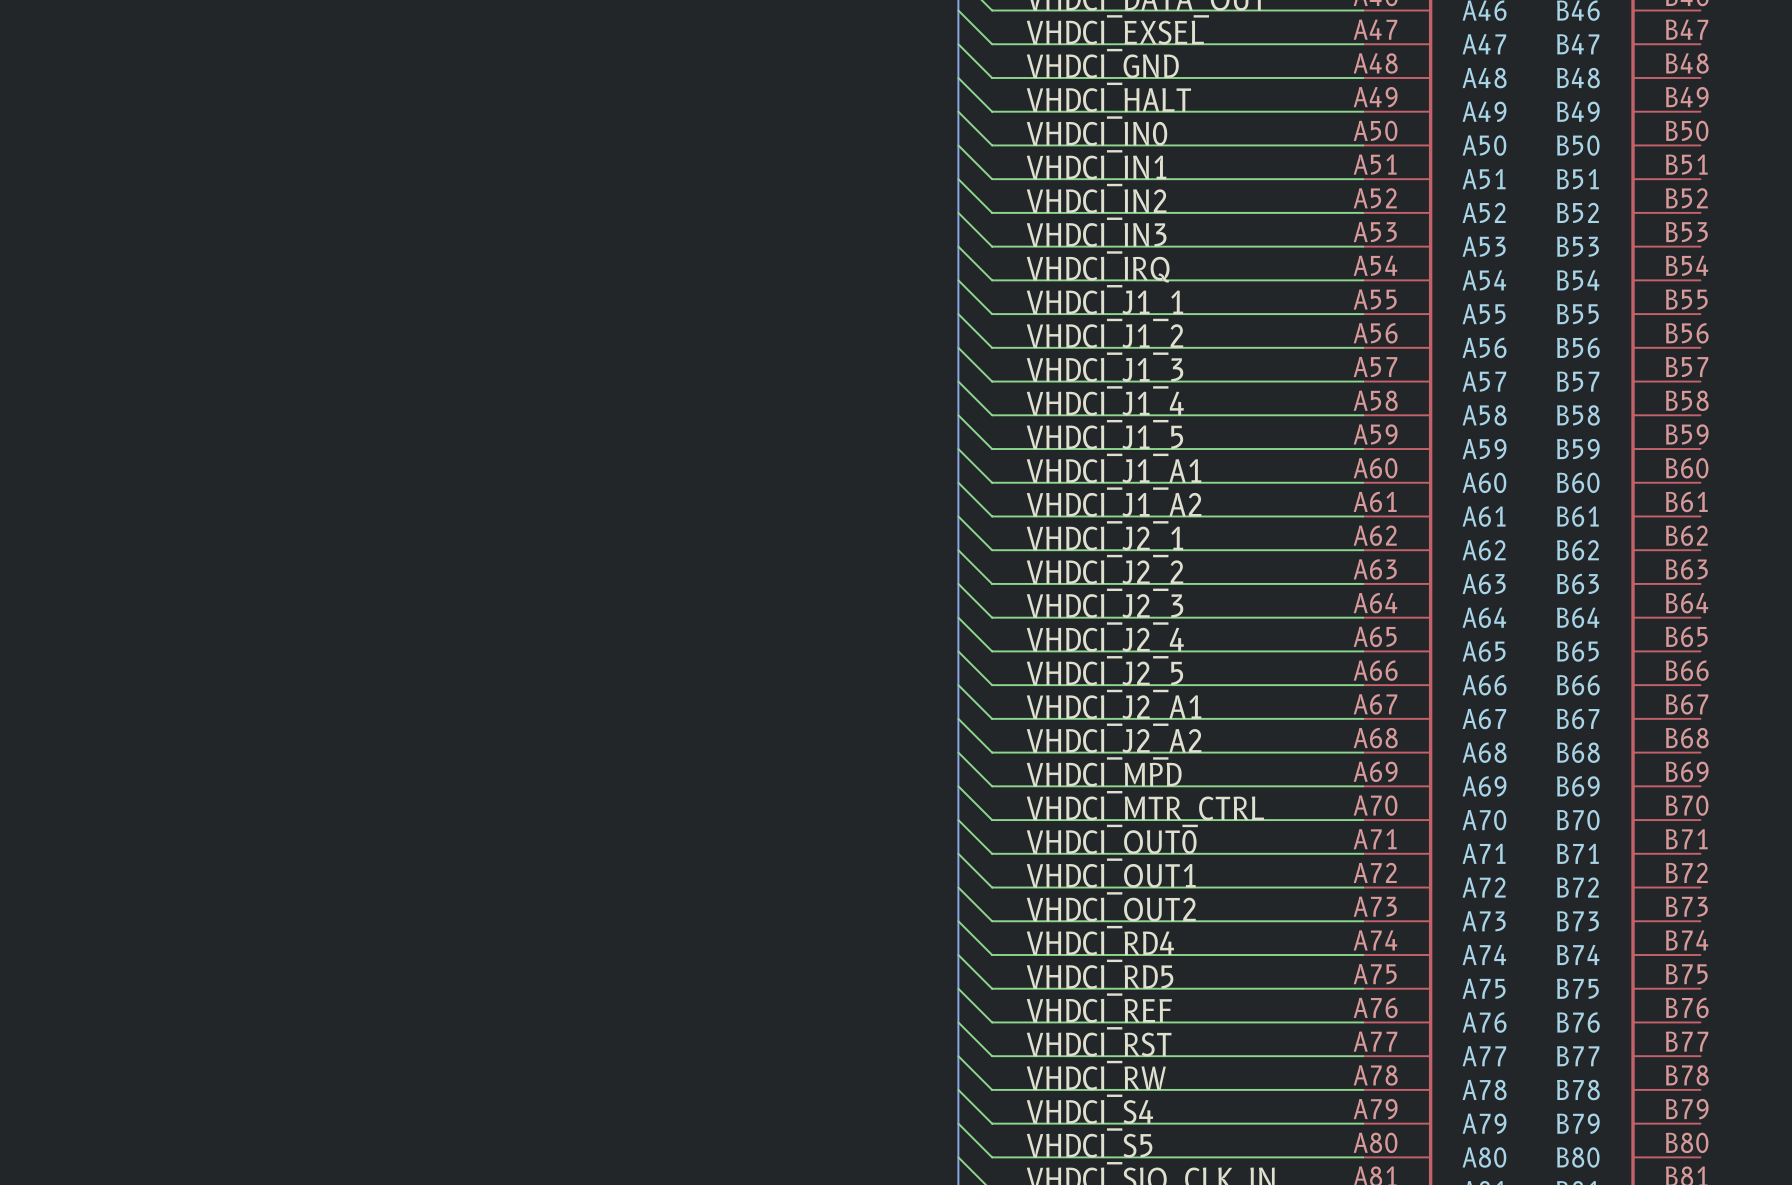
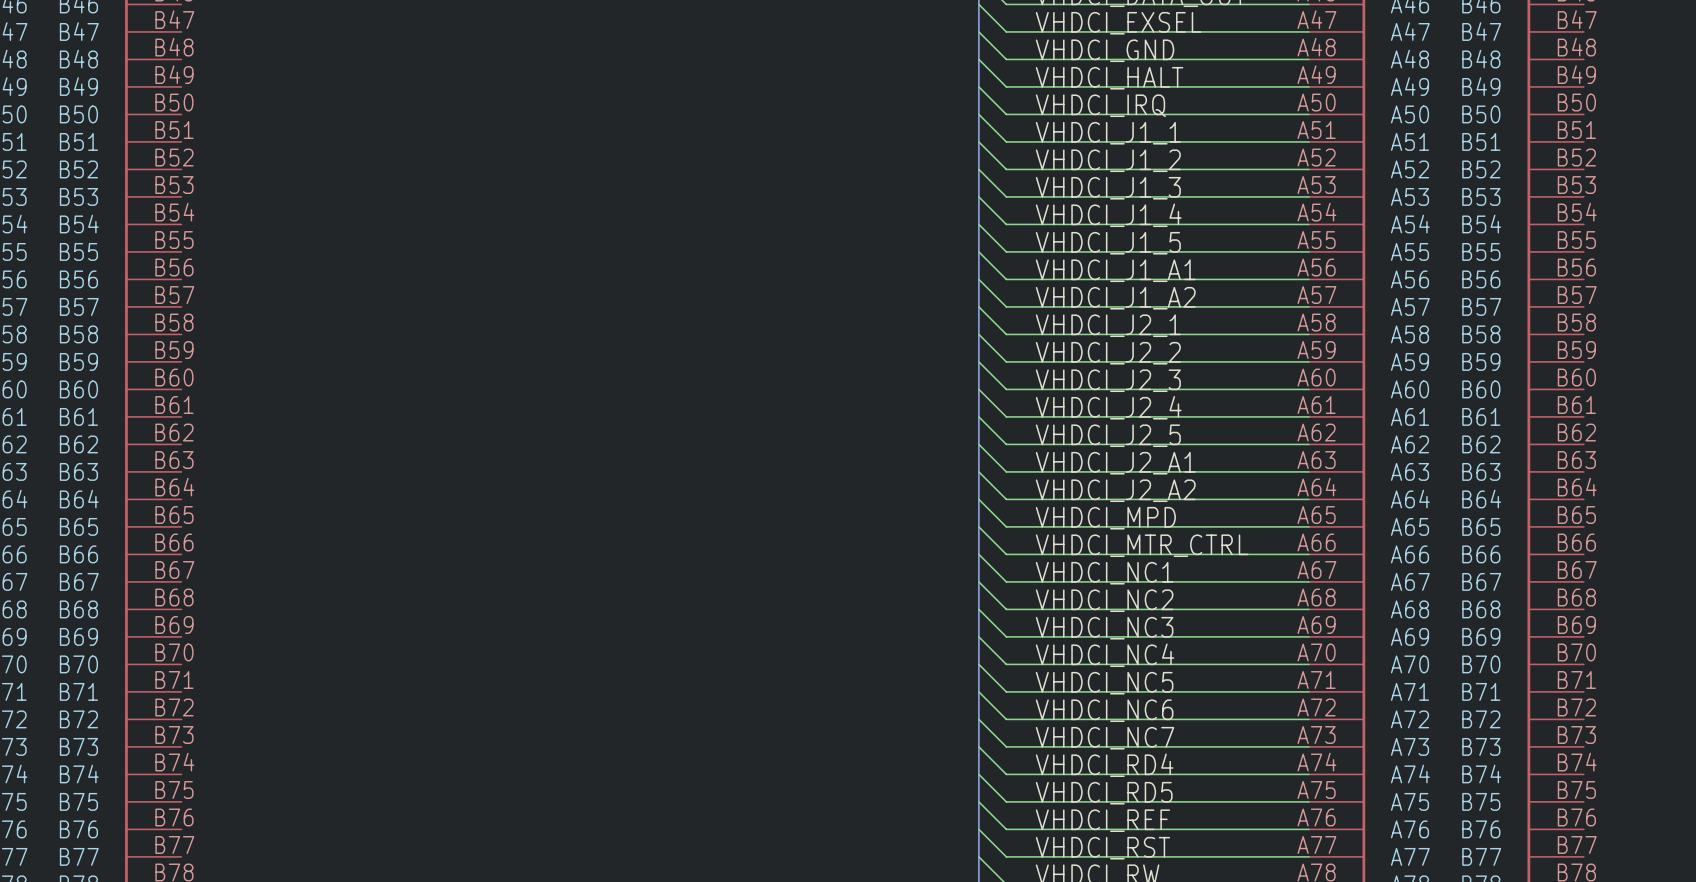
label: VHDCI_IN0 (1096, 137) -> VHDCI_IRQ (1100, 105)
label: VHDCI_IN1 (1096, 170) -> VHDCI_J1_1 (1108, 133)
label: VHDCI_IN2 (1096, 204) -> VHDCI_J1_2 (1108, 160)
label: VHDCI_IN3 (1096, 238) -> VHDCI_J1_3 (1108, 188)
label: VHDCI_IRQ (1098, 272) -> VHDCI_J1_4 (1108, 215)
label: VHDCI_J1_1 (1104, 305) -> VHDCI_J1_5 (1108, 243)
label: VHDCI_J1_2 (1105, 339) -> VHDCI_J1_A1 (1115, 270)
label: VHDCI_J1_3 (1105, 373) -> VHDCI_J1_A2 (1115, 298)
label: VHDCI_J1_4 (1105, 407) -> VHDCI_J2_1 (1108, 325)
label: VHDCI_J1_5 (1104, 440) -> VHDCI_J2_2 (1108, 353)
label: VHDCI_J1_A1 (1114, 474) -> VHDCI_J2_3 (1108, 380)
label: VHDCI_J1_A2 (1114, 508) -> VHDCI_J2_4 (1108, 407)
label: VHDCI_J2_1 (1104, 541) -> VHDCI_J2_5 (1108, 435)
label: VHDCI_J2_2 (1105, 575) -> VHDCI_J2_A1 (1115, 463)
label: VHDCI_J2_3 (1105, 609) -> VHDCI_J2_A2 (1115, 490)
label: VHDCI_J2_4 (1105, 643) -> VHDCI_MPD (1105, 518)
label: VHDCI_J2_5 (1104, 676) -> VHDCI_MTR_CTRL (1142, 545)
label: VHDCI_J2_A1 (1114, 710) -> VHDCI_NC1 (1104, 573)
label: VHDCI_J2_A2 (1114, 744) -> VHDCI_NC2 (1104, 600)
label: VHDCI_MPD (1104, 778) -> VHDCI_NC3 (1104, 628)
label: VHDCI_MTR_CTRL (1145, 811) -> VHDCI_NC4 (1105, 655)
label: VHDCI_OUT0 (1111, 845) -> VHDCI_NC5 (1104, 683)
label: VHDCI_OUT1 (1111, 879) -> VHDCI_NC6 (1104, 710)
label: VHDCI_OUT2 (1111, 912) -> VHDCI_NC7 (1105, 738)

